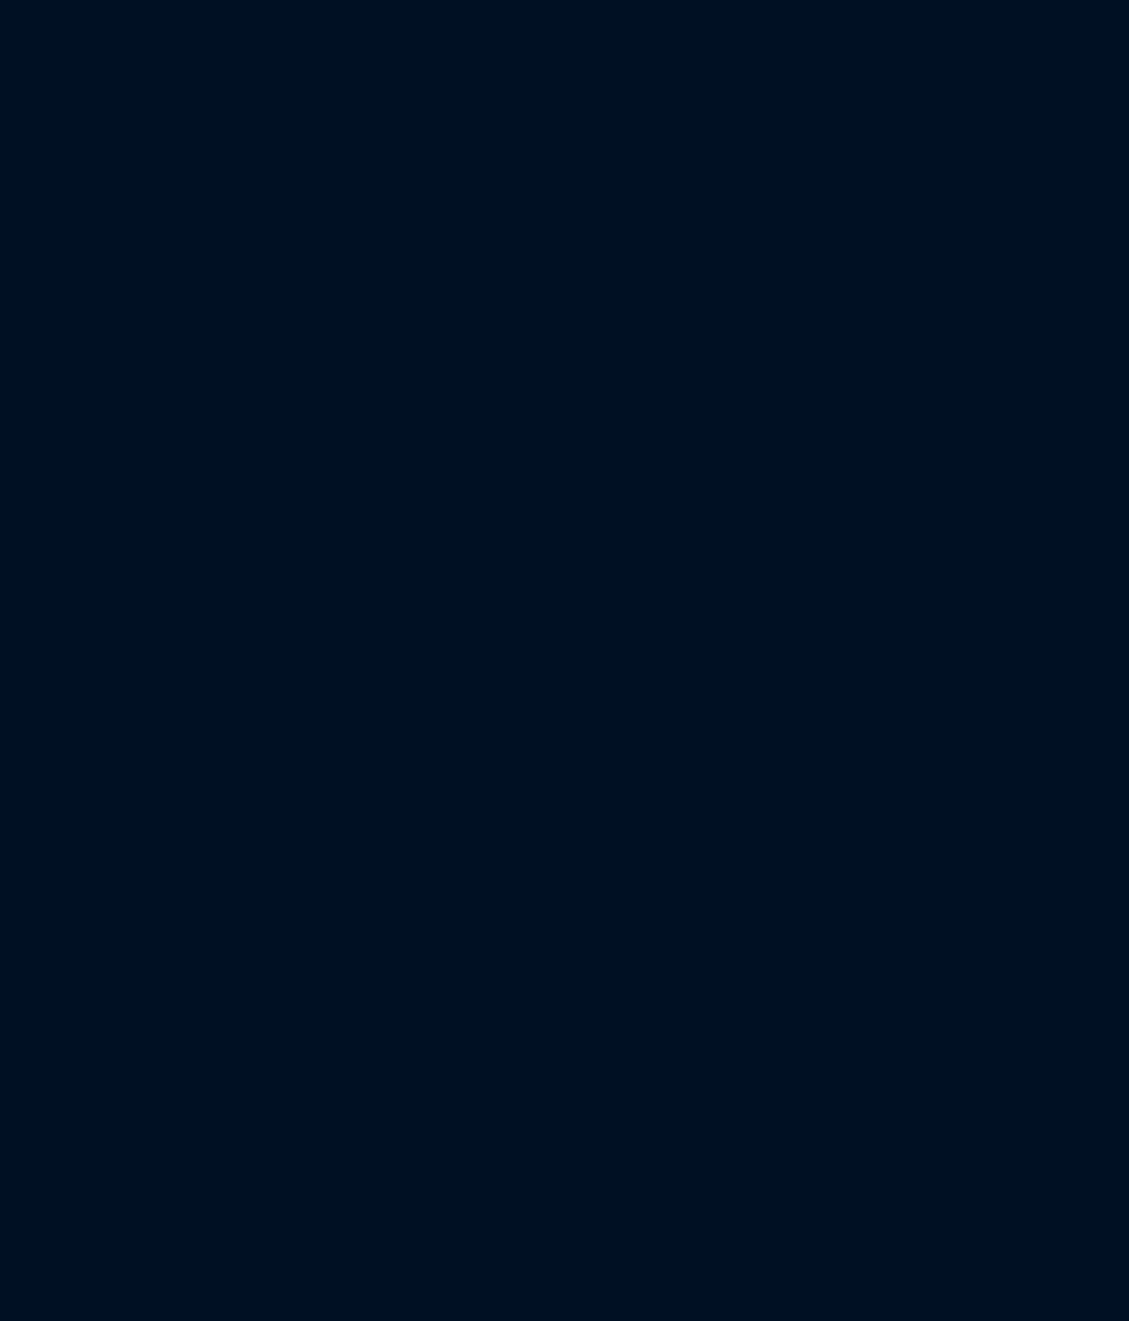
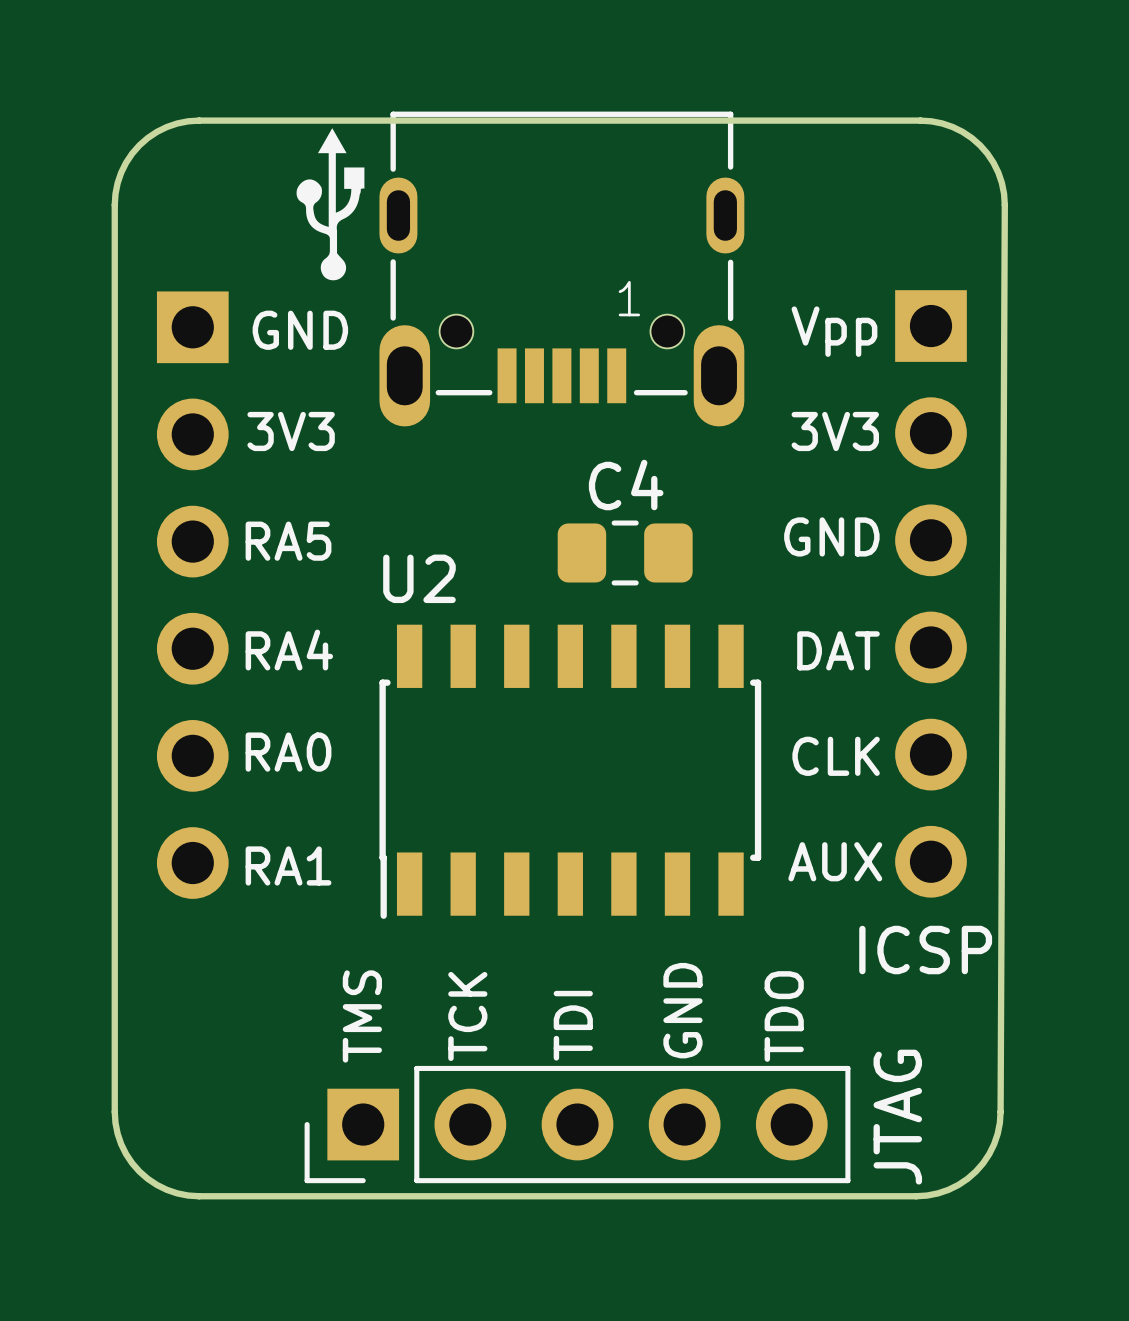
board edge: none -> (199, 120) (920, 120) (942, 123) (962, 131) (987, 153) (998, 172) (1004, 204) (1000, 1111) (994, 1144) (983, 1163) (967, 1178) (938, 1193) (916, 1196) (199, 1196) (177, 1193) (156, 1184) (132, 1163) (121, 1144) (114, 1111) (114, 204) (121, 172) (139, 145) (166, 127) (199, 120)
drawing: none -> [296, 128, 365, 281]
part: none -> (561, 269)
text: none -> GND (300, 330)
text: none -> Vpp (834, 331)
text: none -> 3V3 (291, 431)
text: none -> 3V3 (835, 431)
text: none -> GND (831, 536)
text: none -> RA5 (288, 541)
C4: none -> (625, 552)
part: none -> ICSP (930, 593)
part: none -> (192, 595)
text: none -> RA4 (289, 650)
text: none -> DAT (838, 650)
text: none -> RA0 (288, 752)
text: none -> CLK (836, 756)
U2: none -> (570, 771)
text: none -> AUX (835, 861)
text: none -> RA1 (288, 865)
text: none -> GND (682, 1010)
text: none -> TCK (467, 1016)
text: none -> TMS (362, 1016)
text: none -> TDO (784, 1016)
text: none -> TDI (573, 1025)
part: none -> JTAG (577, 1124)

